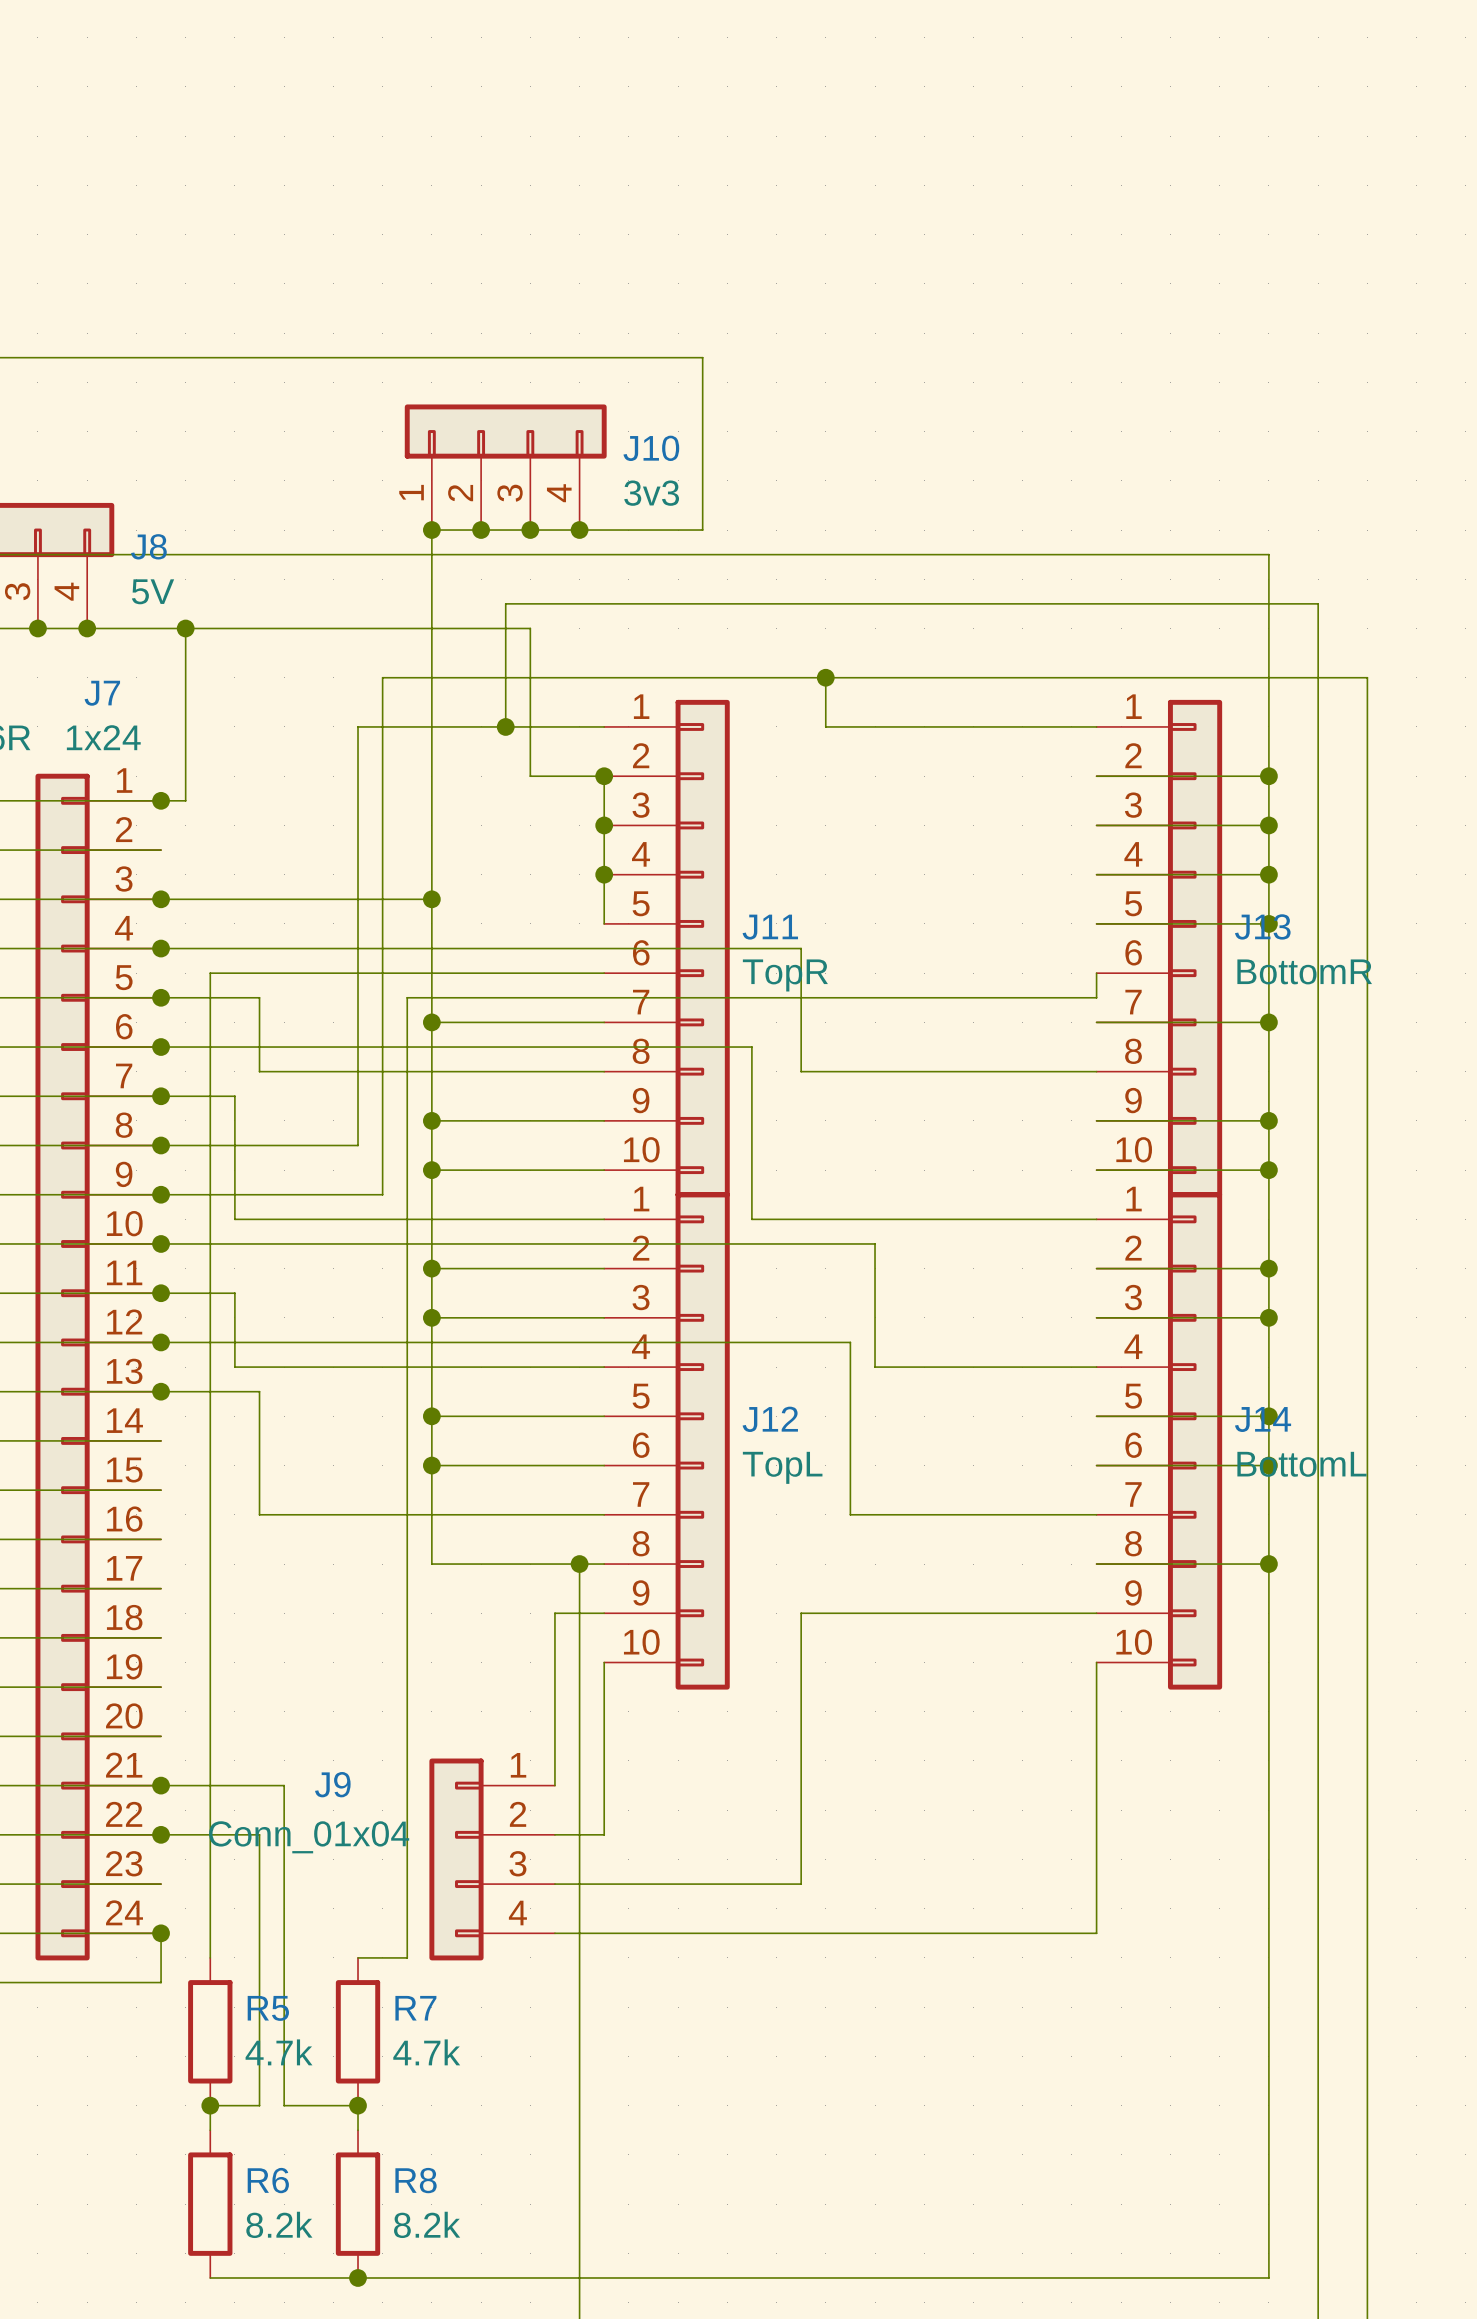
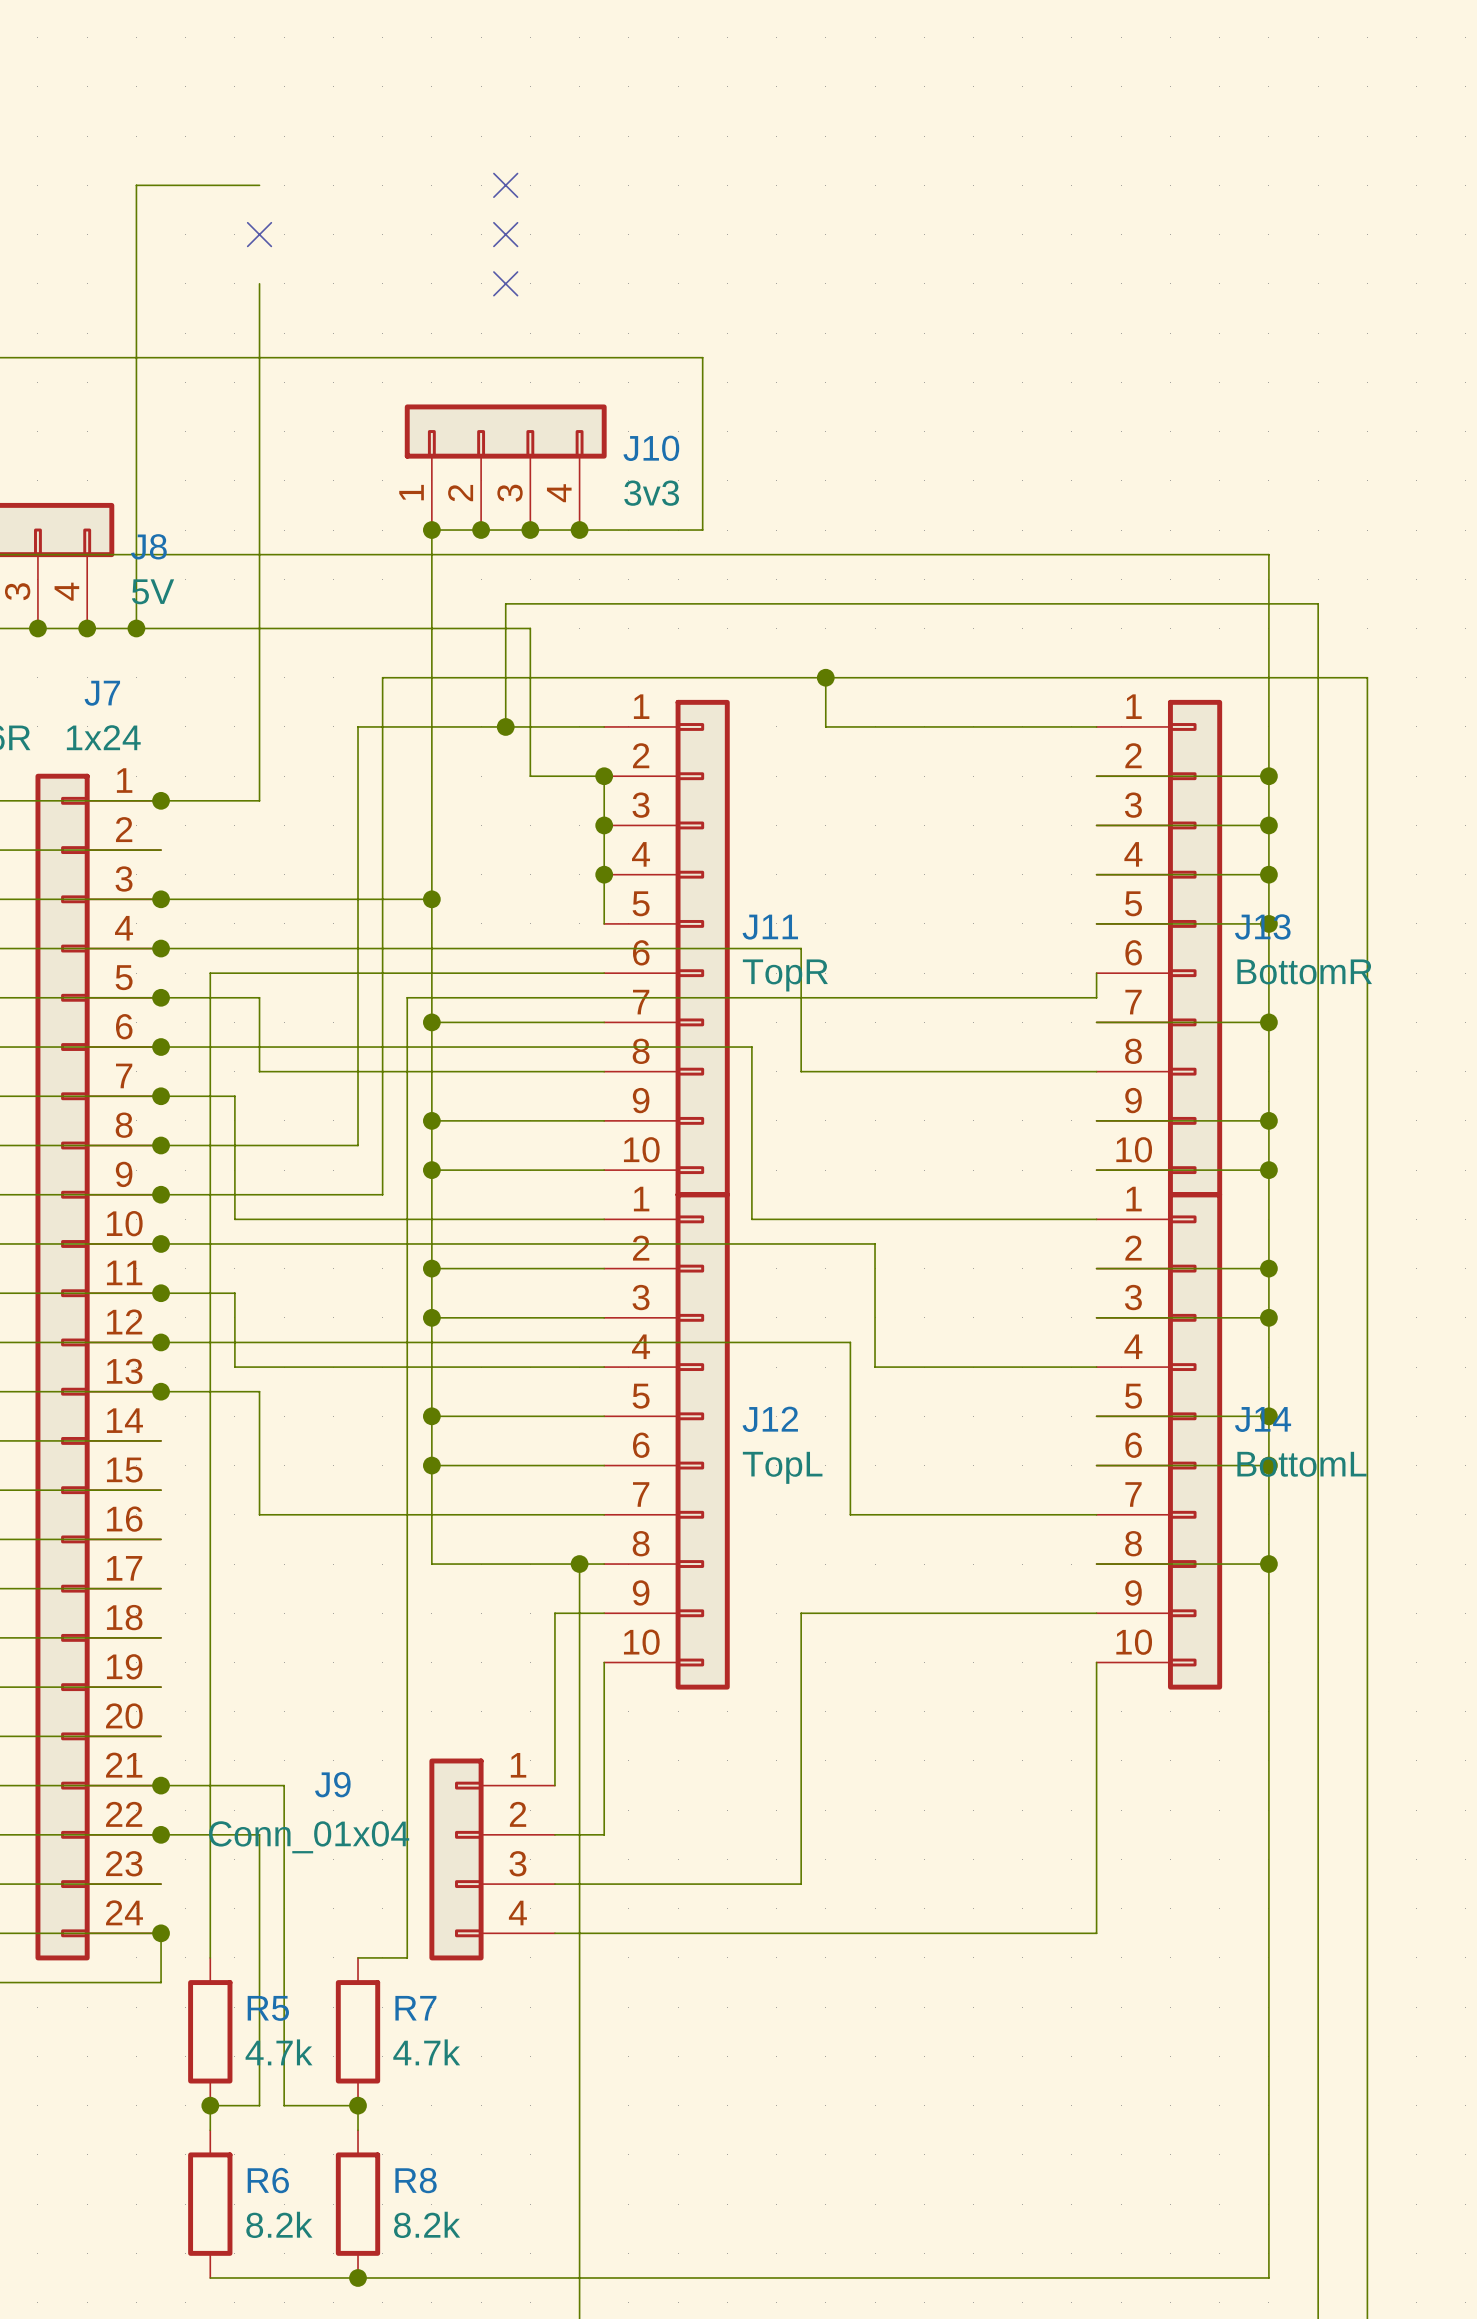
wire: none -> (259, 185) (136, 185) (136, 628)
no-connect mark: none -> (505, 185)
no-connect mark: none -> (259, 234)
no-connect mark: none -> (505, 234)
no-connect mark: none -> (505, 283)
wire: (185, 628) (185, 800) -> (259, 283) (259, 800) (185, 800)
junction position: (185, 628) -> (136, 628)

